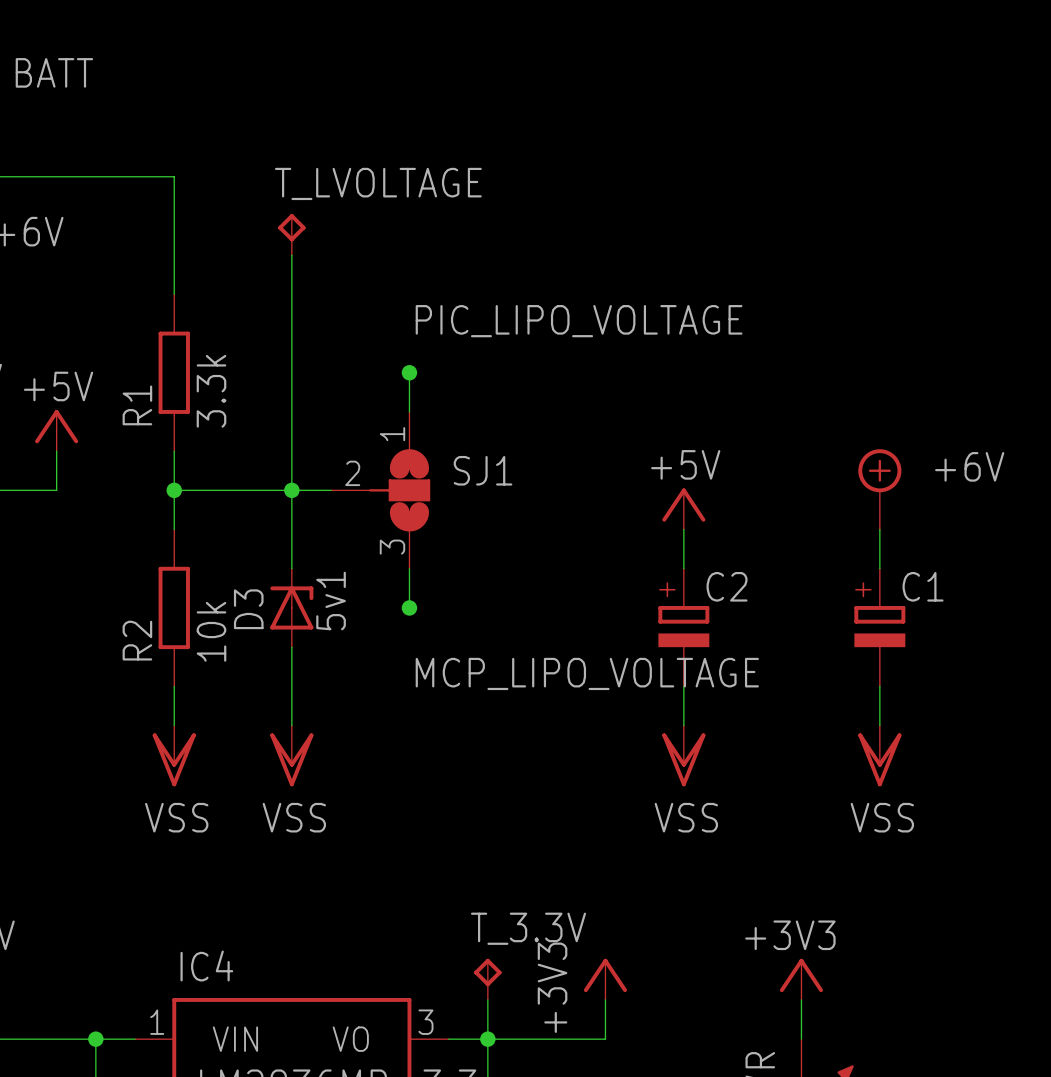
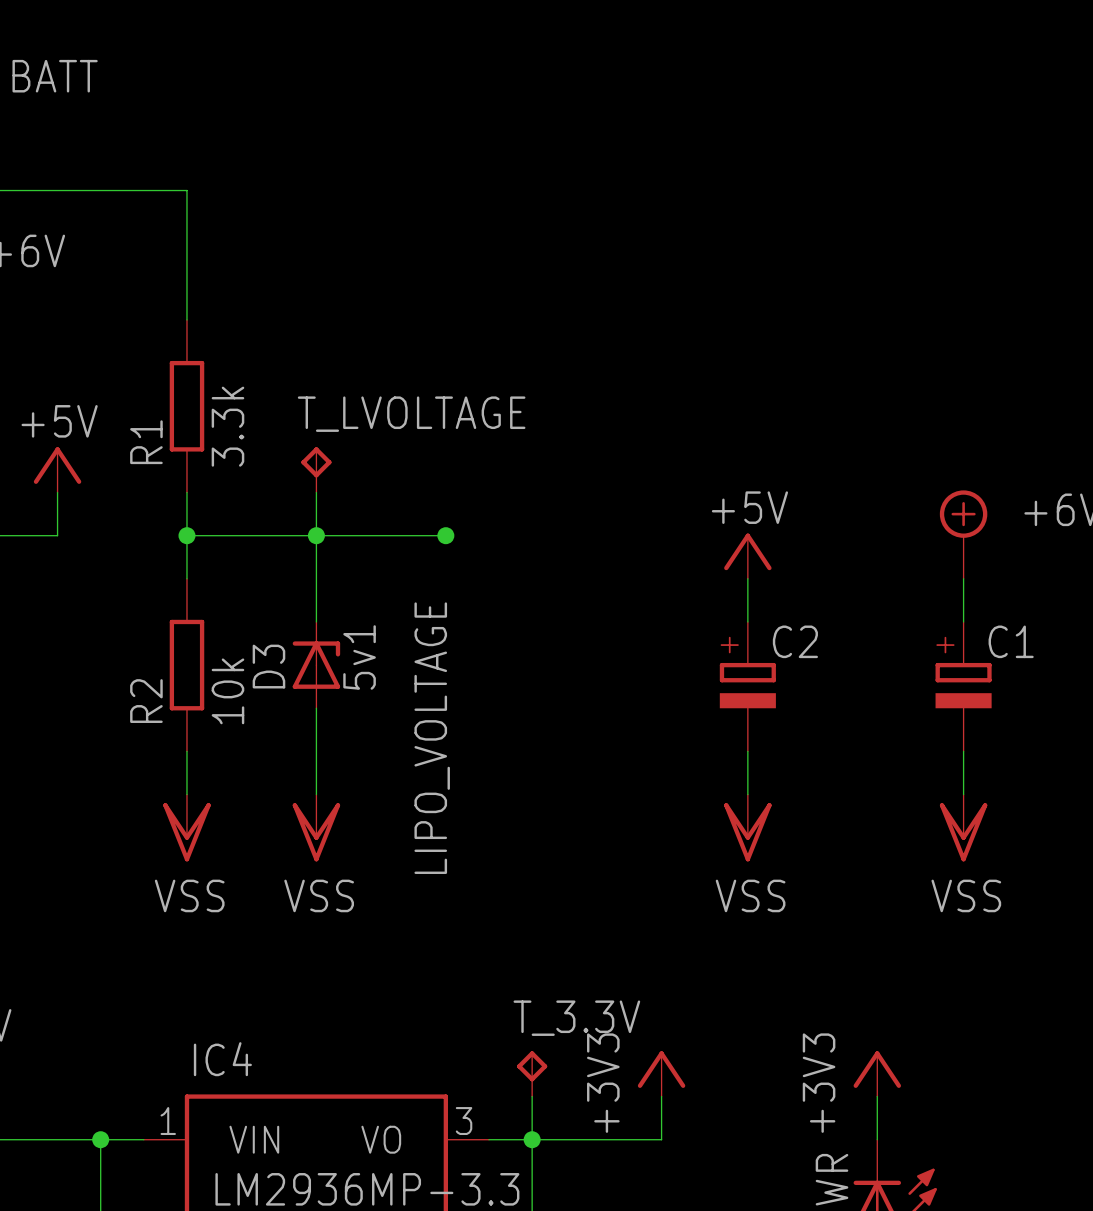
T_LVOLTAGE position: (291, 234) -> (316, 469)
wire: (291, 255) (291, 451) -> none
label: PIC_LIPO_VOLTAGE (579, 321) -> none
wire: (409, 372) (409, 411) -> none
junction: (409, 372) -> none
SJ1: (380, 490) -> none
junction: none -> (445, 535)
wire: (409, 568) (409, 607) -> none
junction: (409, 607) -> none
label: MCP_LIPO_VOLTAGE (587, 673) -> LIPO_VOLTAGE (432, 738)
power symbol text rotation: 0° (790, 935) -> 90° counterclockwise (819, 1083)

